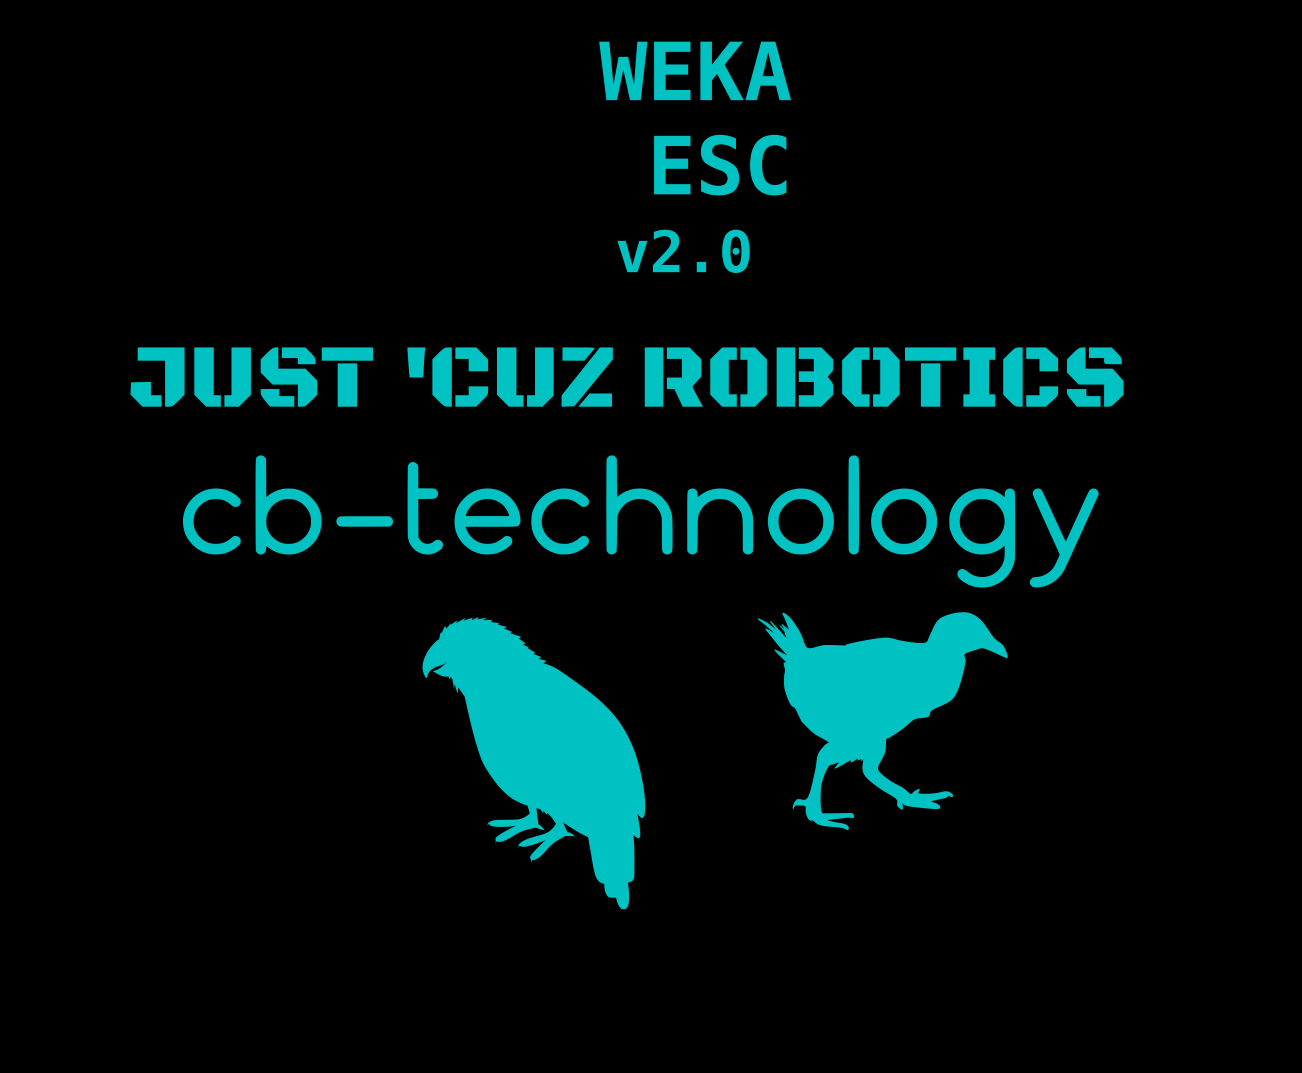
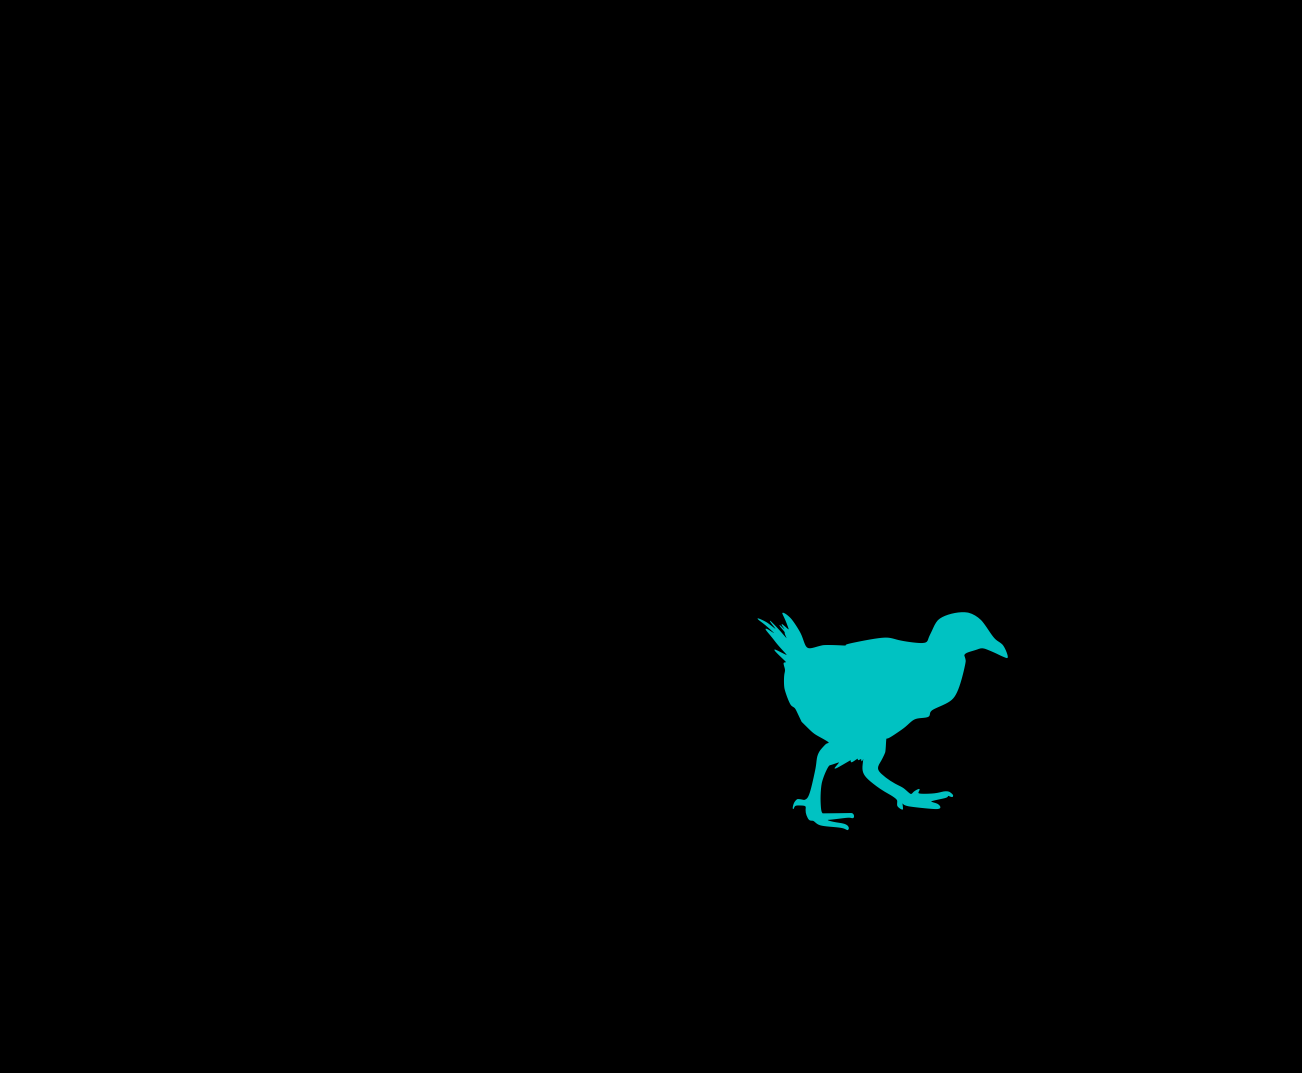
text: WEKA (695, 70) -> none
text: ESC (720, 165) -> none
text: v2.0 (683, 251) -> none
drawing: [130, 347, 1124, 910] -> none

